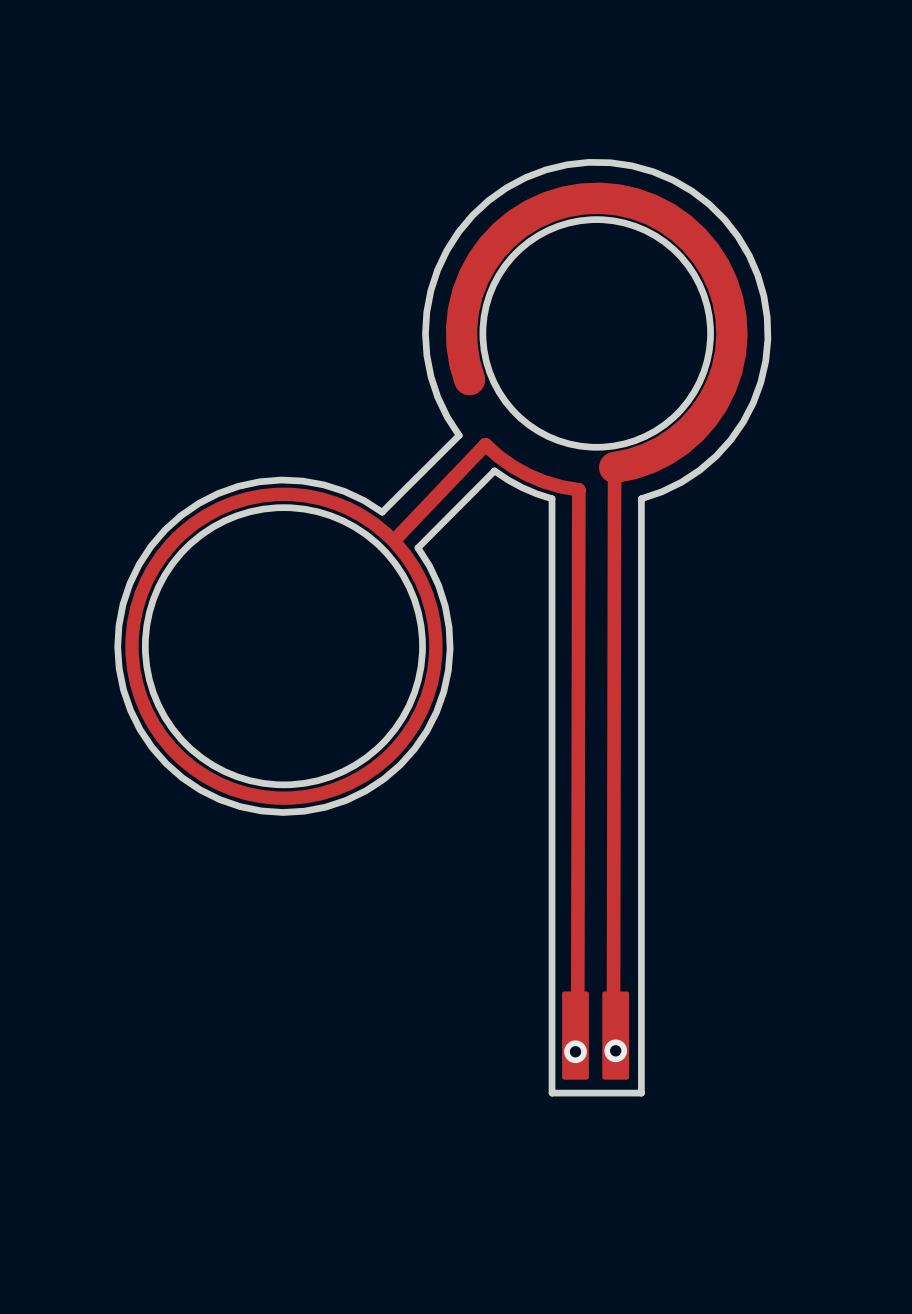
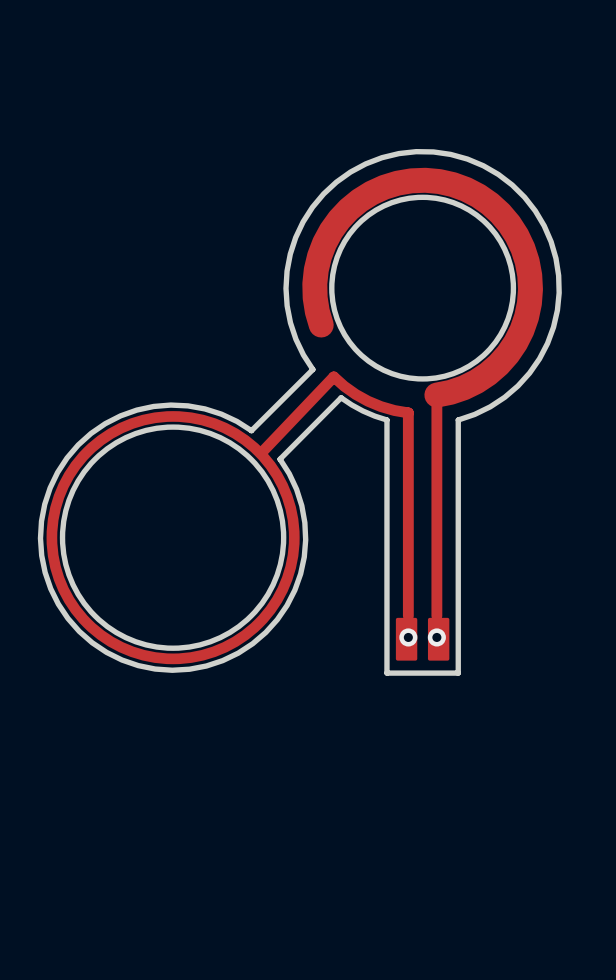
track: (614, 467) (613, 1023) -> (436, 395) (436, 616)
track: (578, 489) (577, 1023) -> (408, 412) (408, 616)
drawing: none -> [395, 617, 450, 661]
via: none -> (408, 637)
via: none -> (436, 637)
board edge: (552, 816) (552, 1093) (641, 1093) (641, 816) -> (386, 673) (458, 673)
drawing: [562, 991, 630, 1080] -> none
via: (615, 1050) -> none
via: (575, 1051) -> none

